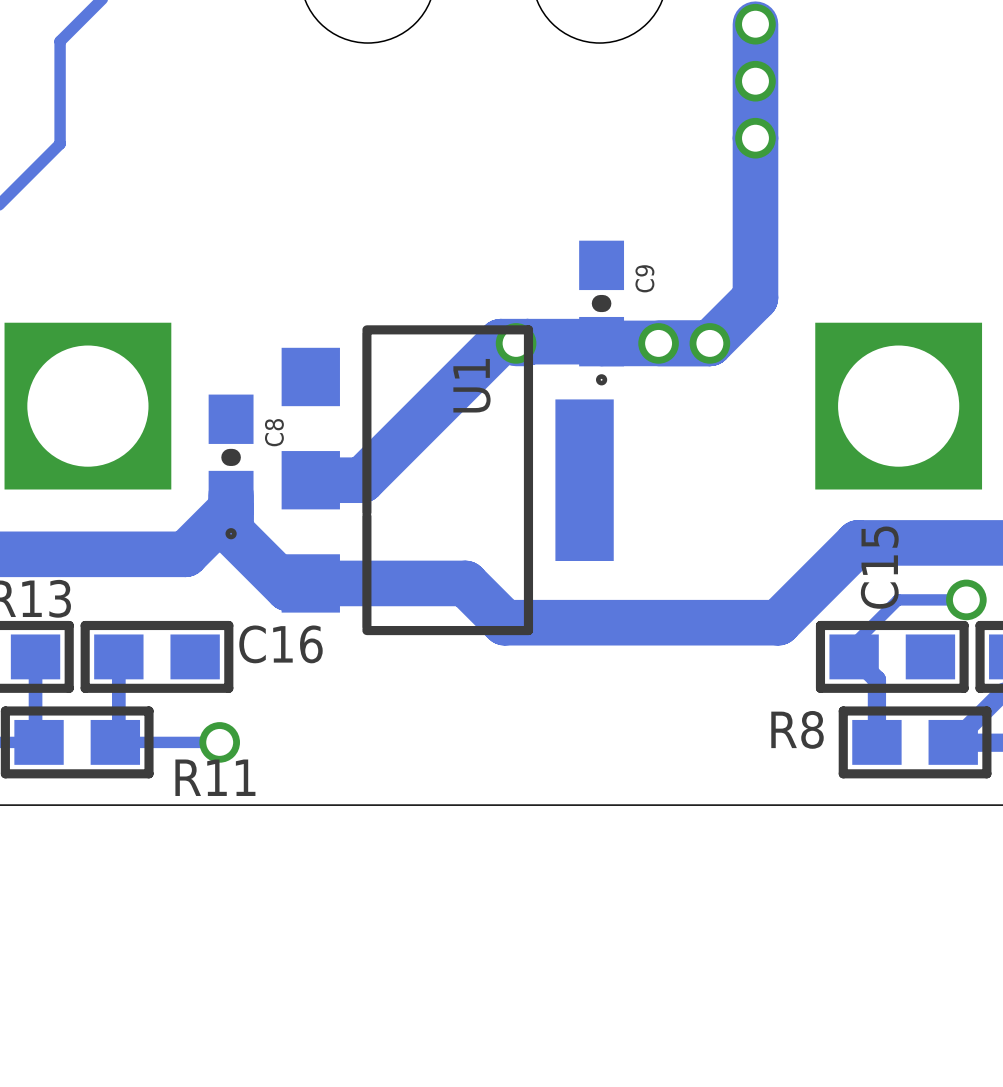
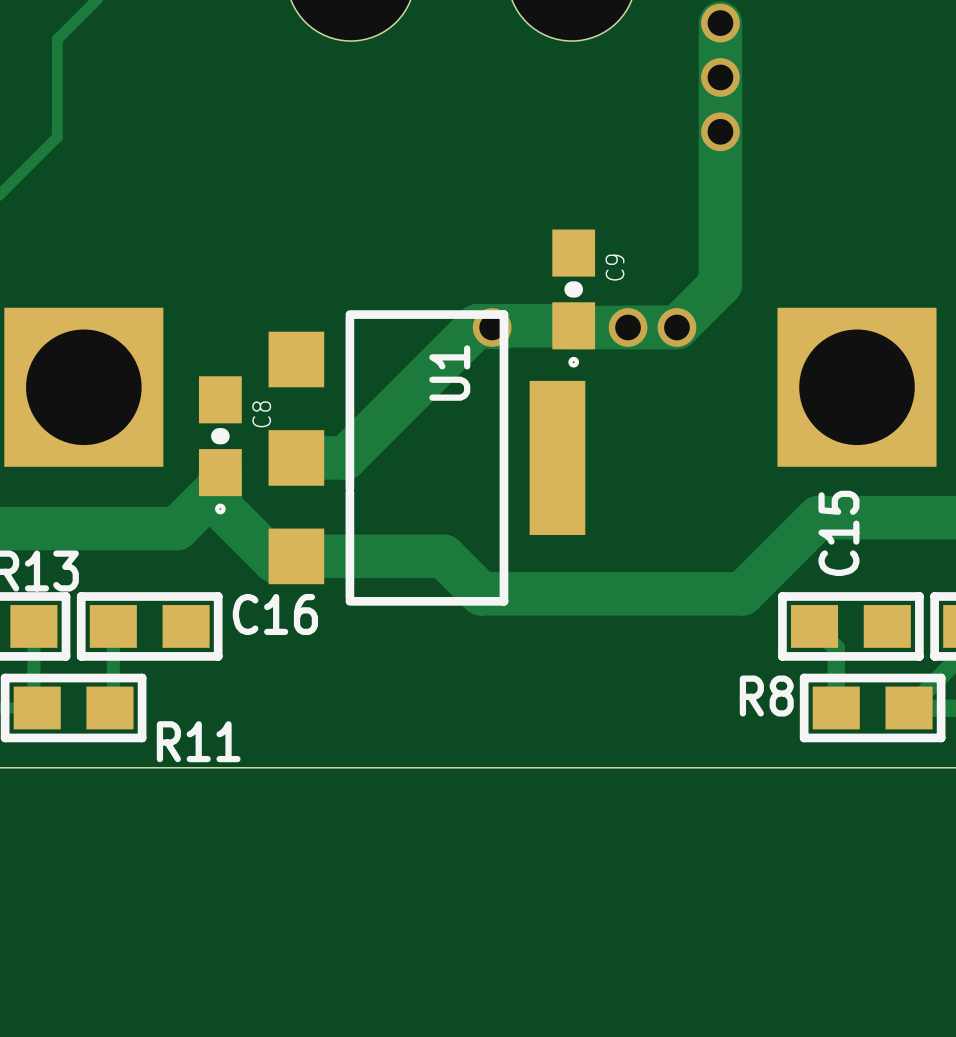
track: (966, 599) (897, 599) (854, 643) (854, 656) -> none
via: (966, 599) -> none
track: (219, 742) (115, 742) -> none
via: (219, 742) -> none

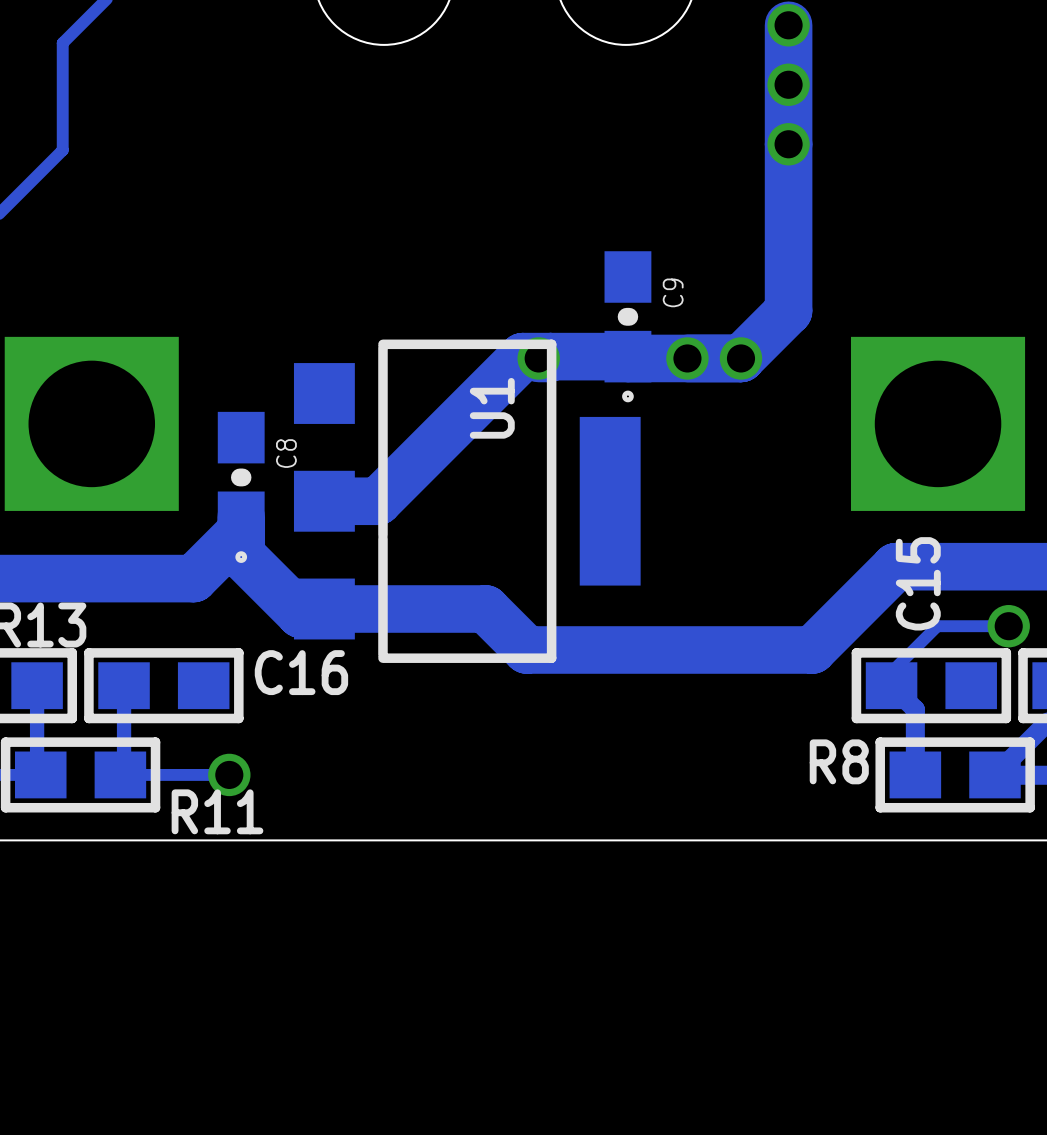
track: none -> (1008, 626) (937, 626) (891, 671) (891, 685)
via: none -> (1008, 626)
track: none -> (229, 774) (120, 774)
via: none -> (229, 774)

